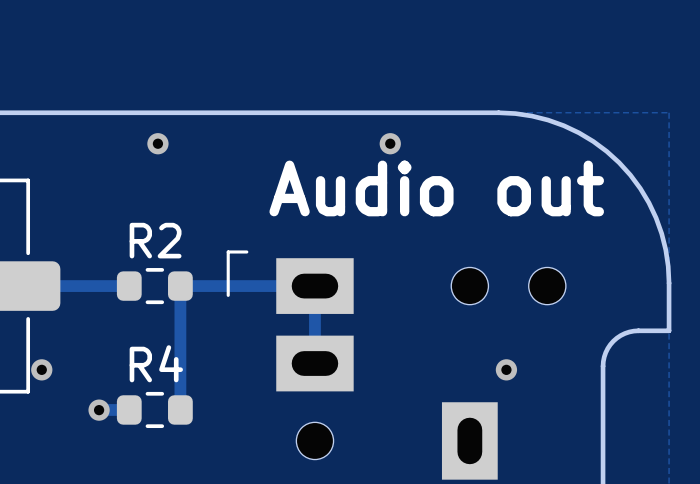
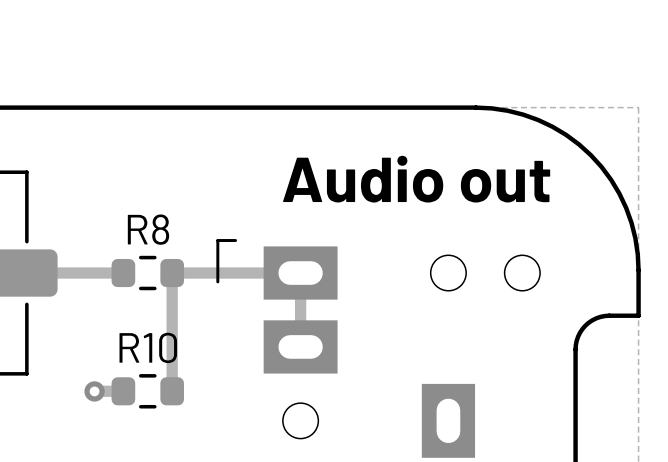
via: (157, 143) -> none
via: (390, 143) -> none
R2 name: R2 (155, 240) -> R8 (148, 229)
R4 name: R4 (156, 363) -> R10 (148, 347)
via: (41, 369) -> none
via: (506, 369) -> none

